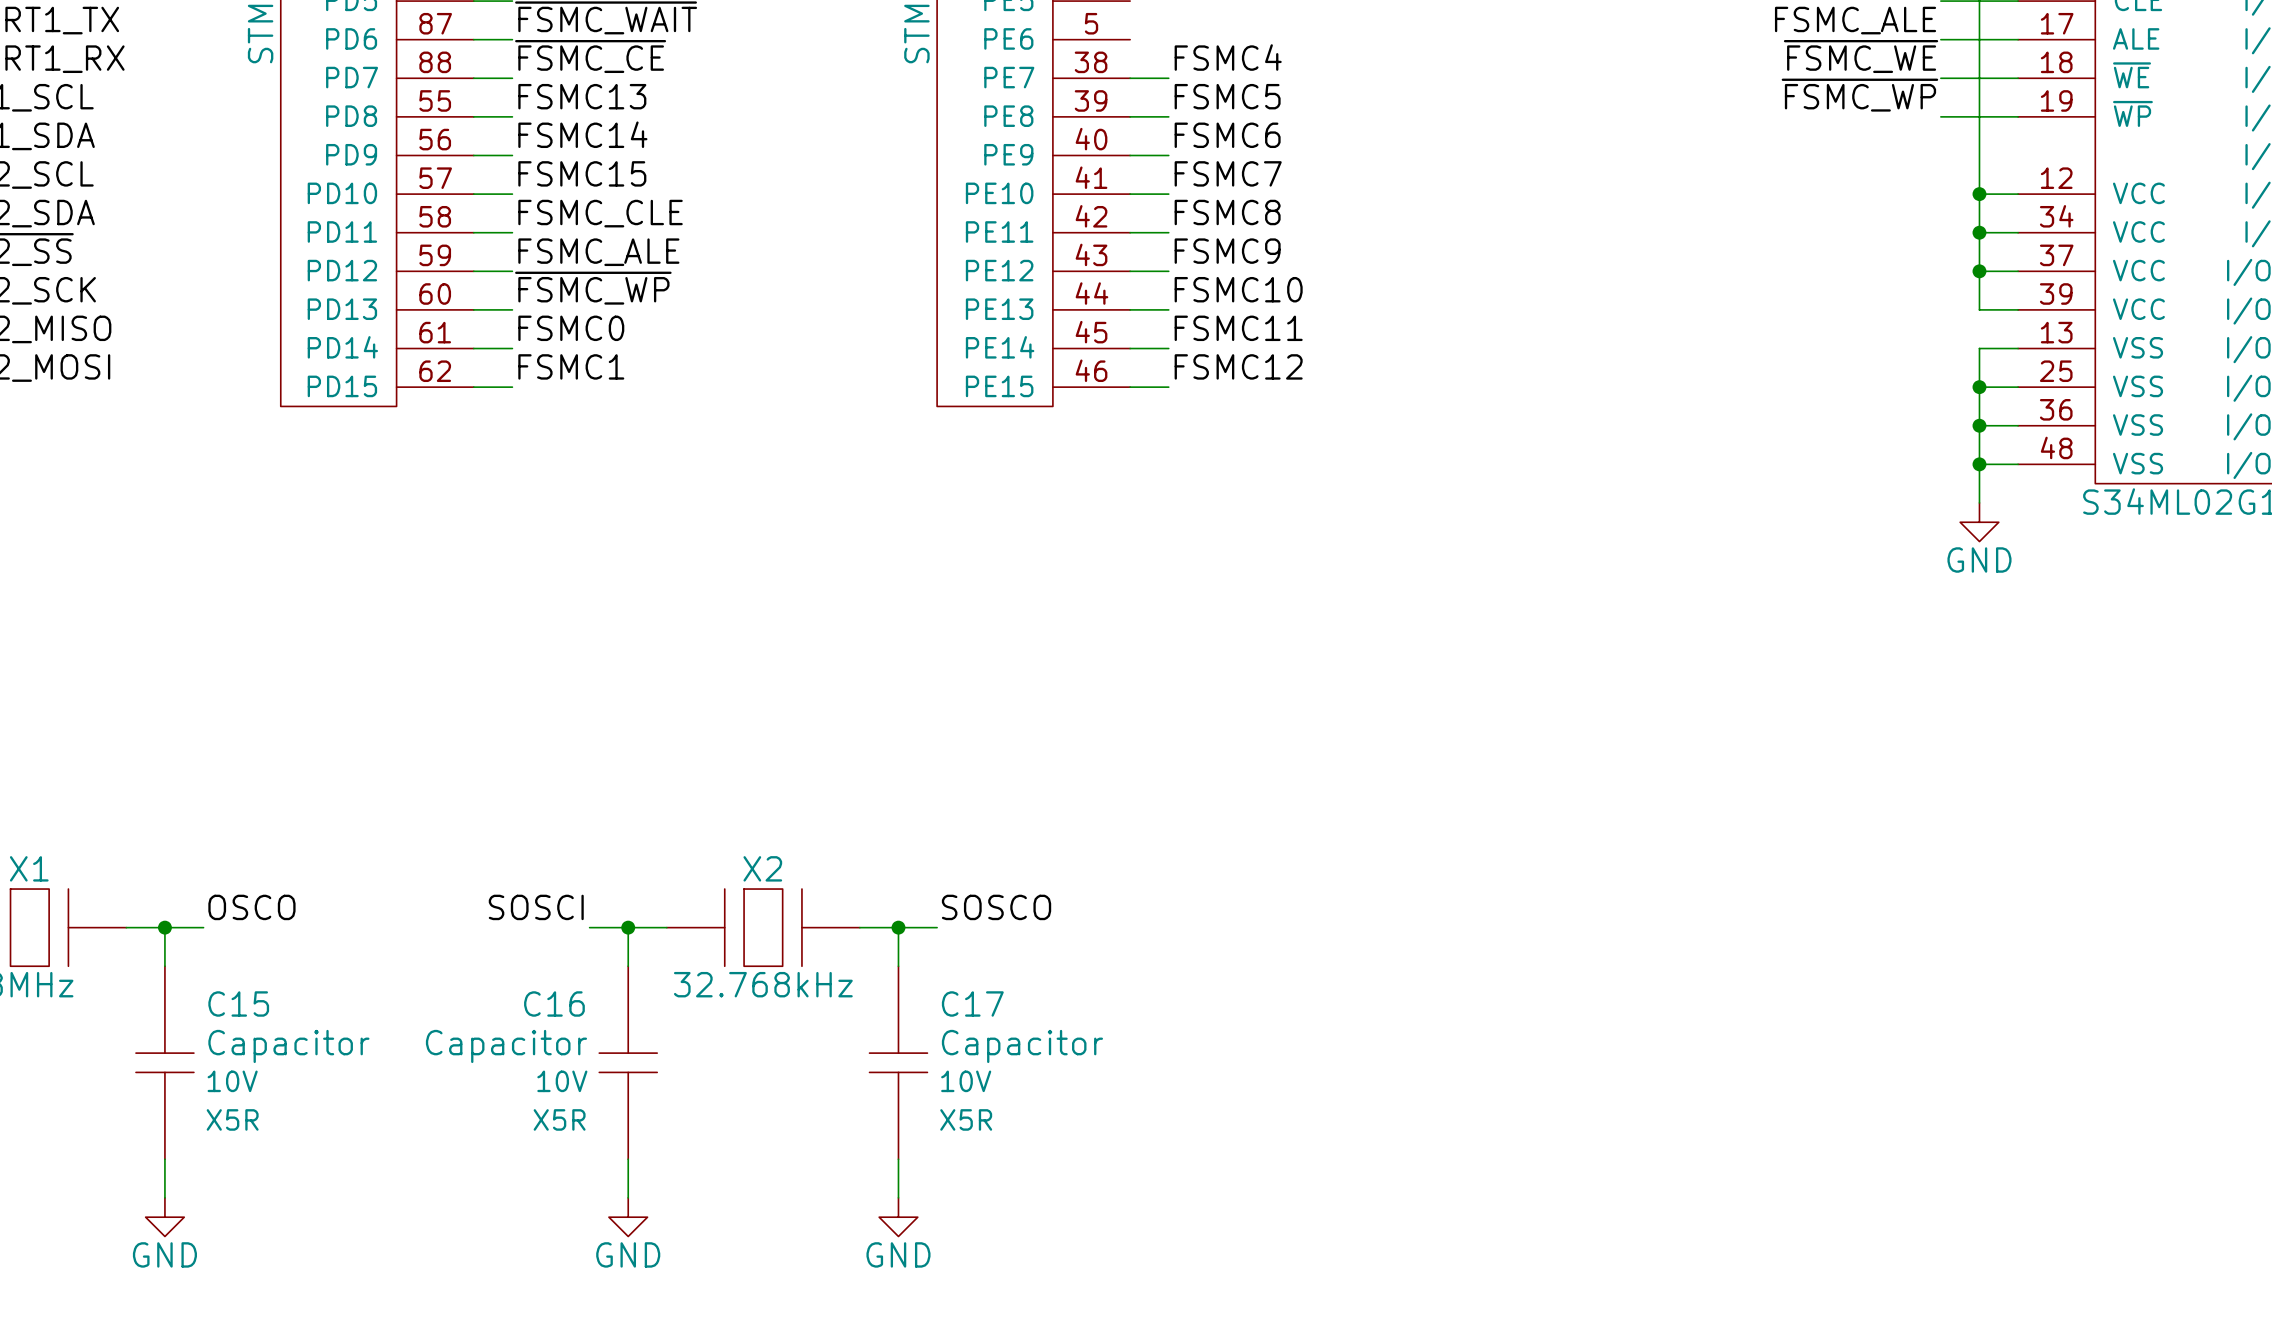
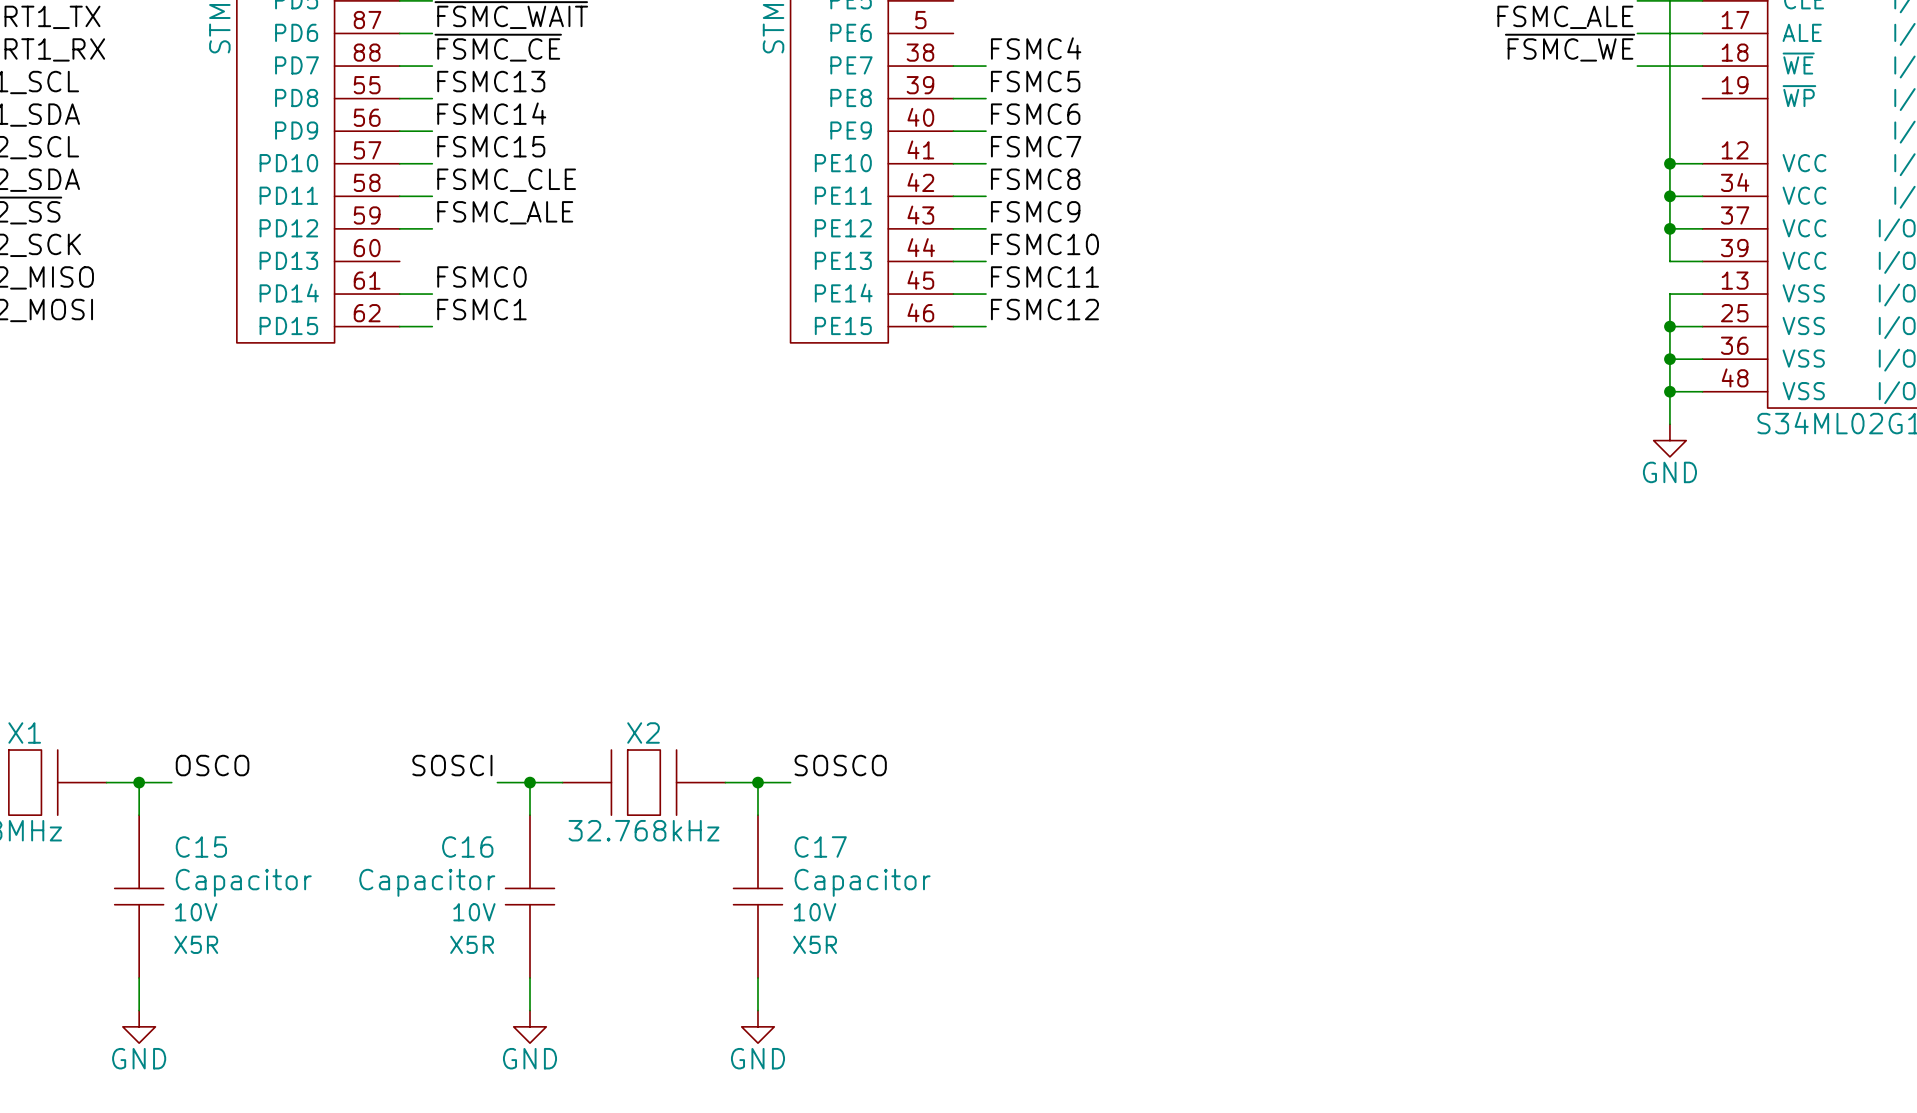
label: ~{FSMC_WP} (1859, 95) -> none
wire: (1940, 116) (2018, 116) -> none
label: ~{FSMC_WP} (593, 288) -> none
wire: (473, 309) (512, 309) -> none

